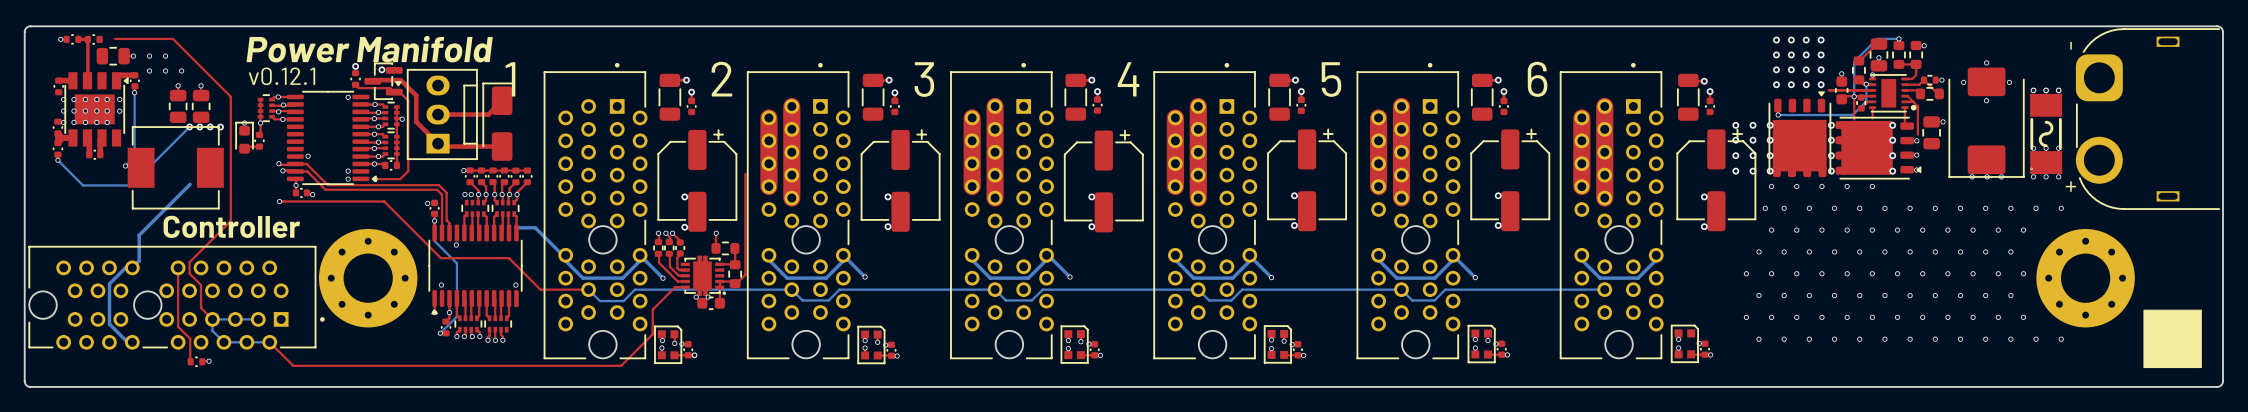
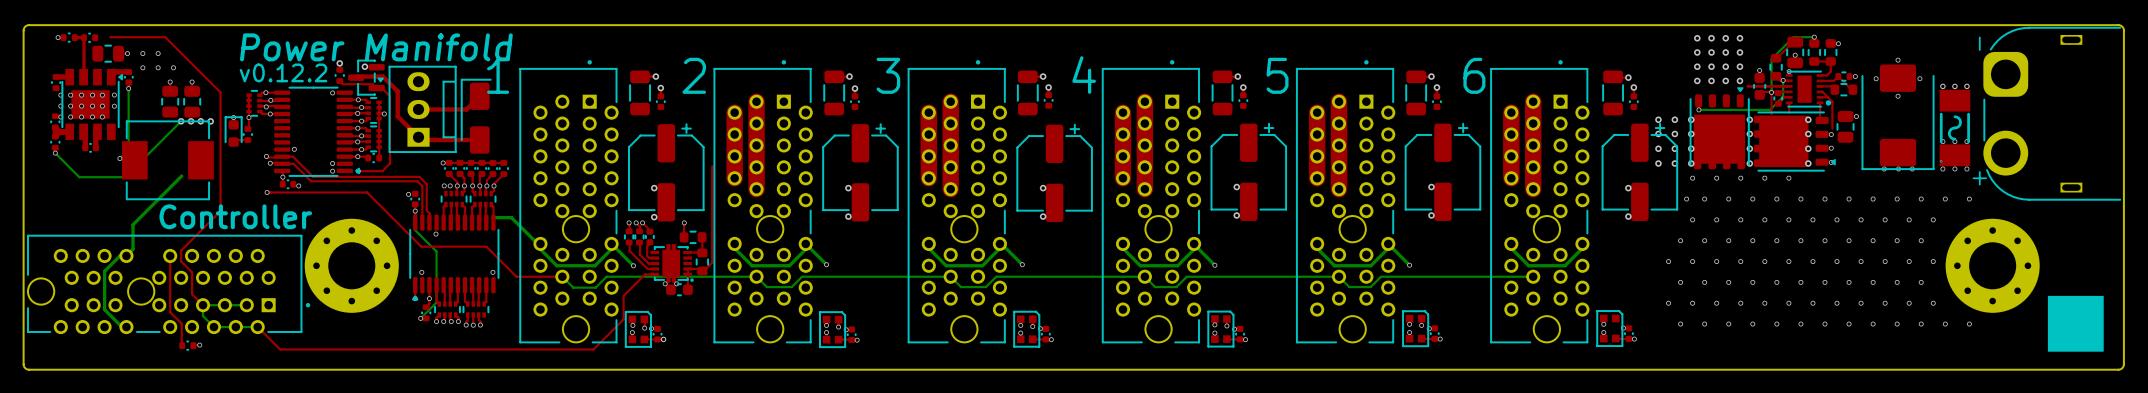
text: v0.12.1 (281, 76) -> v0.12.2 (283, 72)

